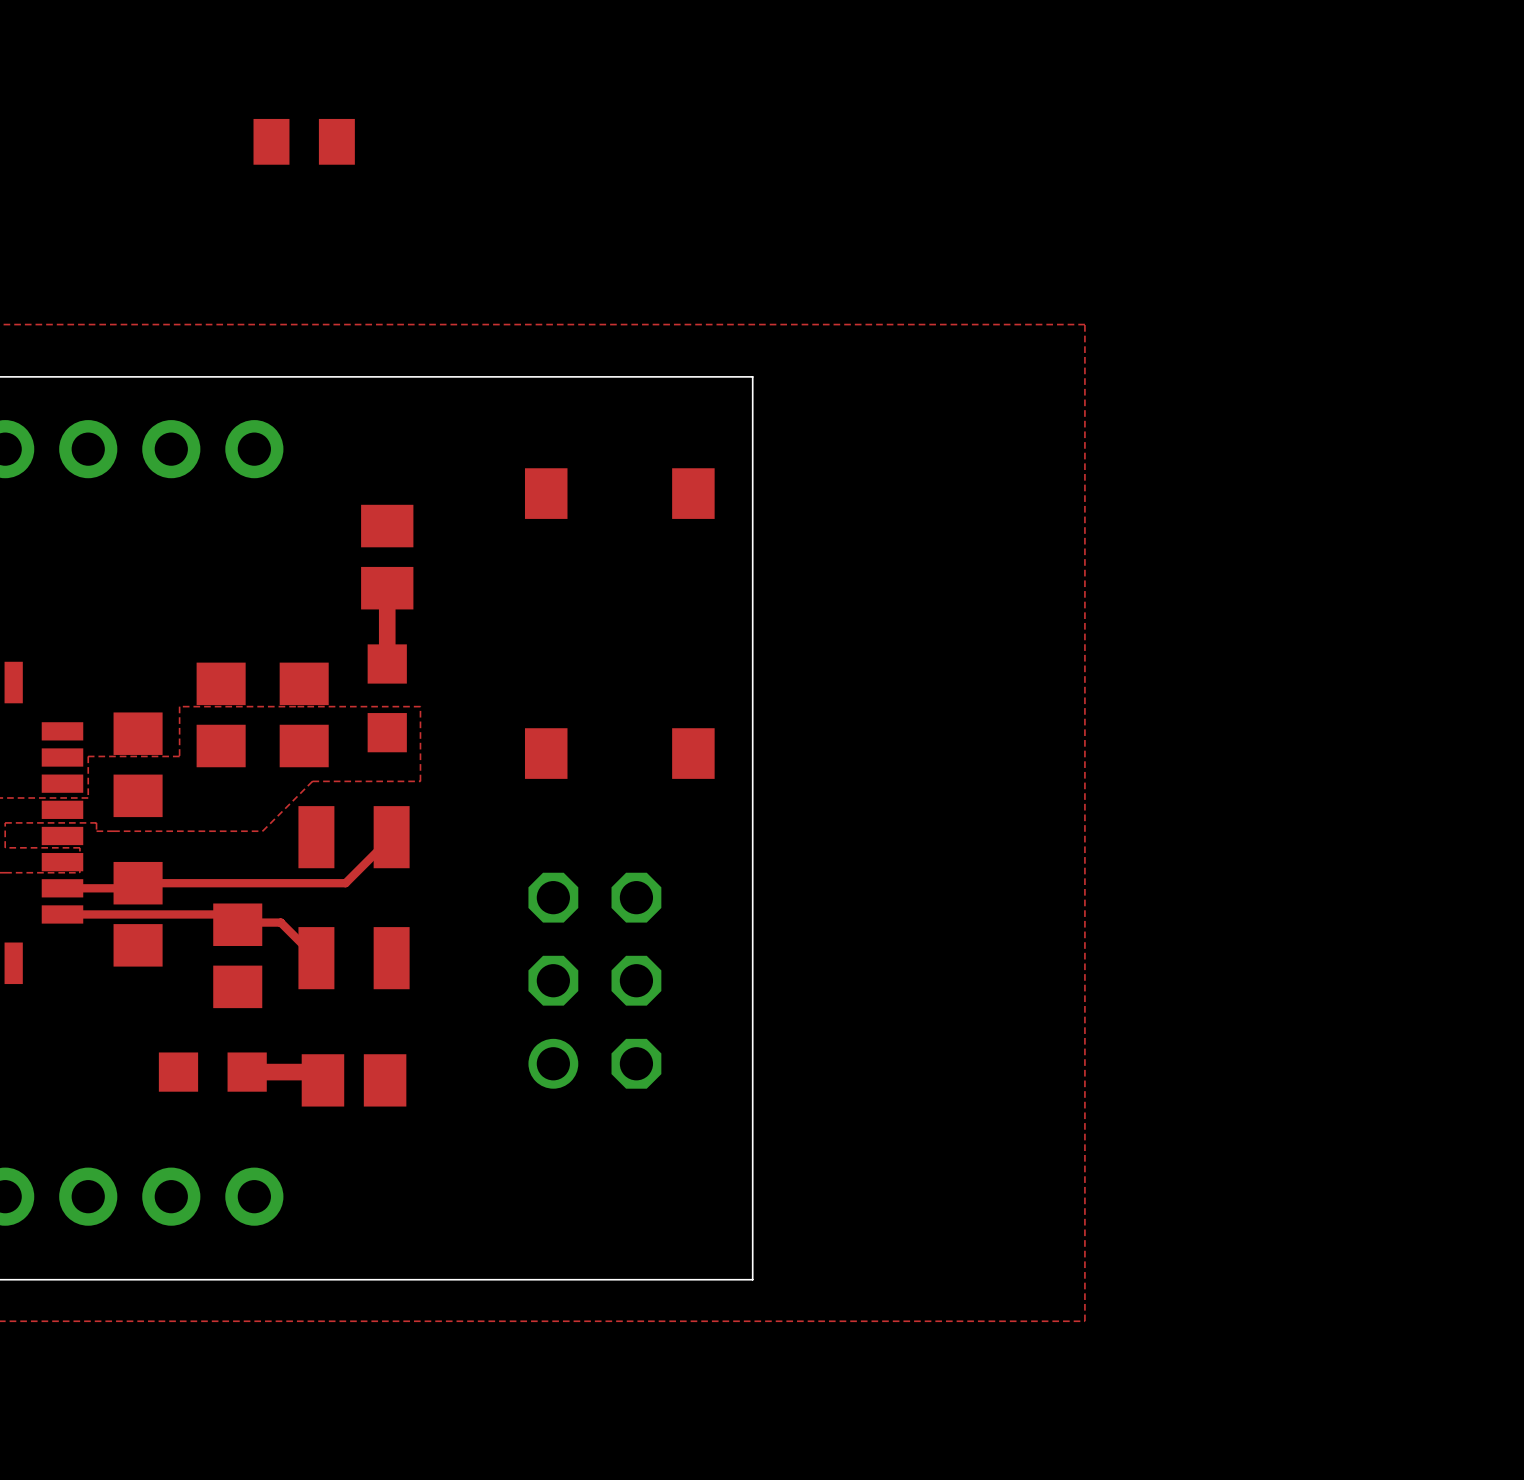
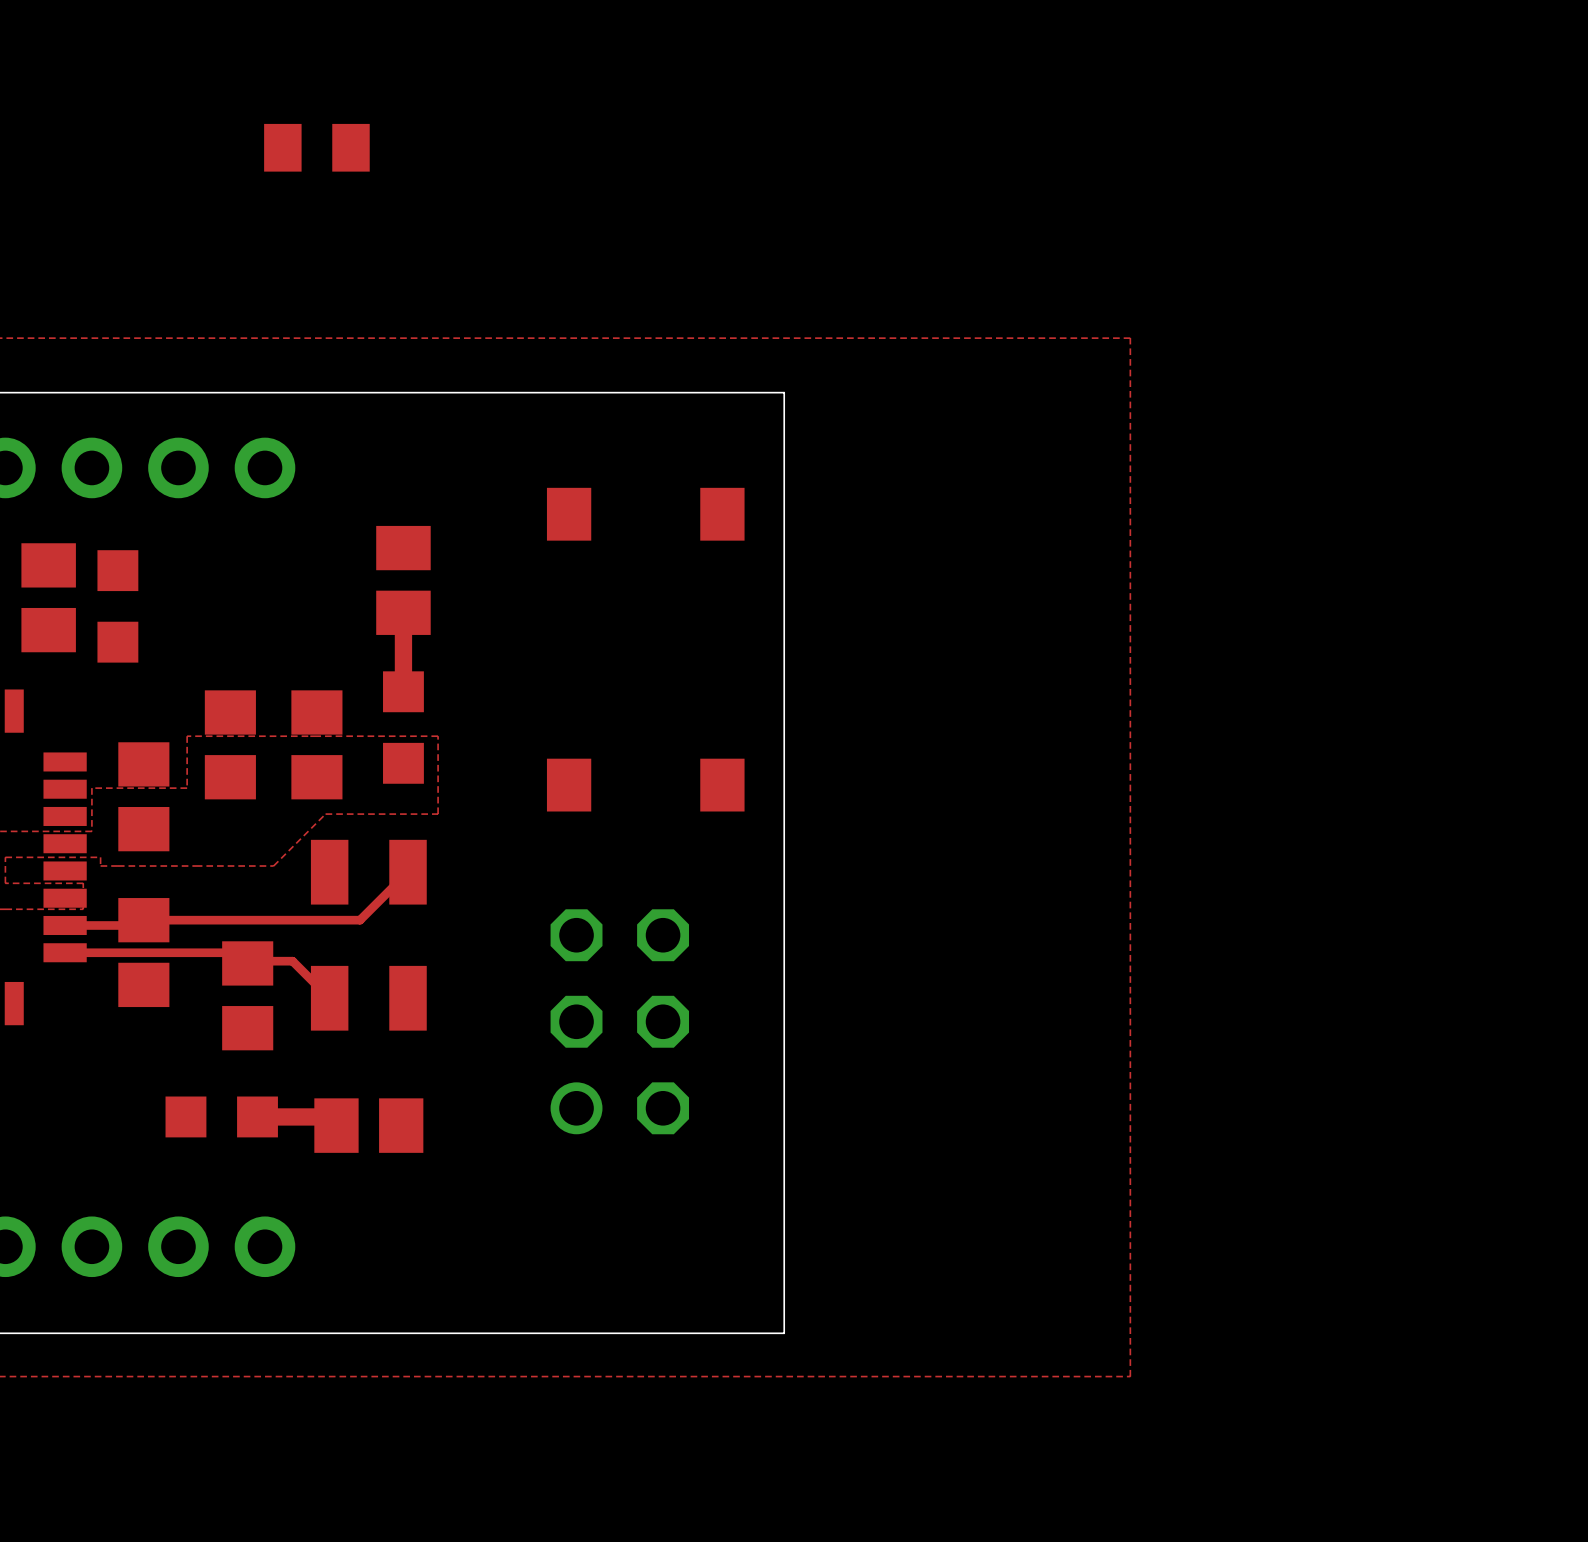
part: none -> (48, 597)
part: none -> (117, 606)

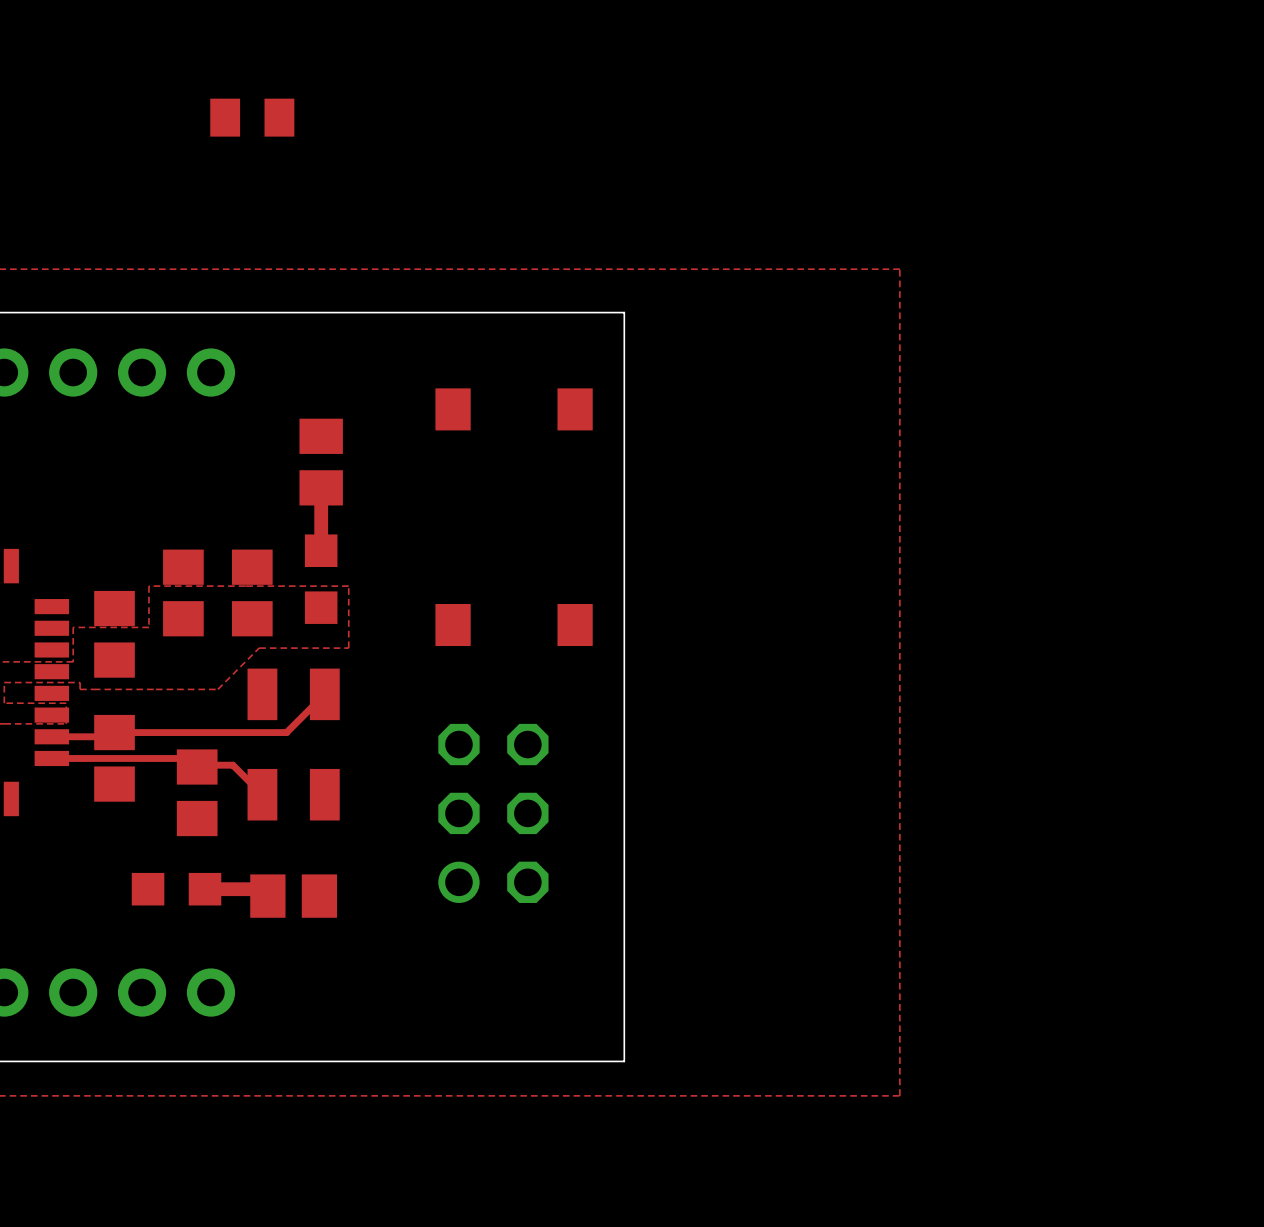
part: (48, 597) -> none
part: (117, 606) -> none

